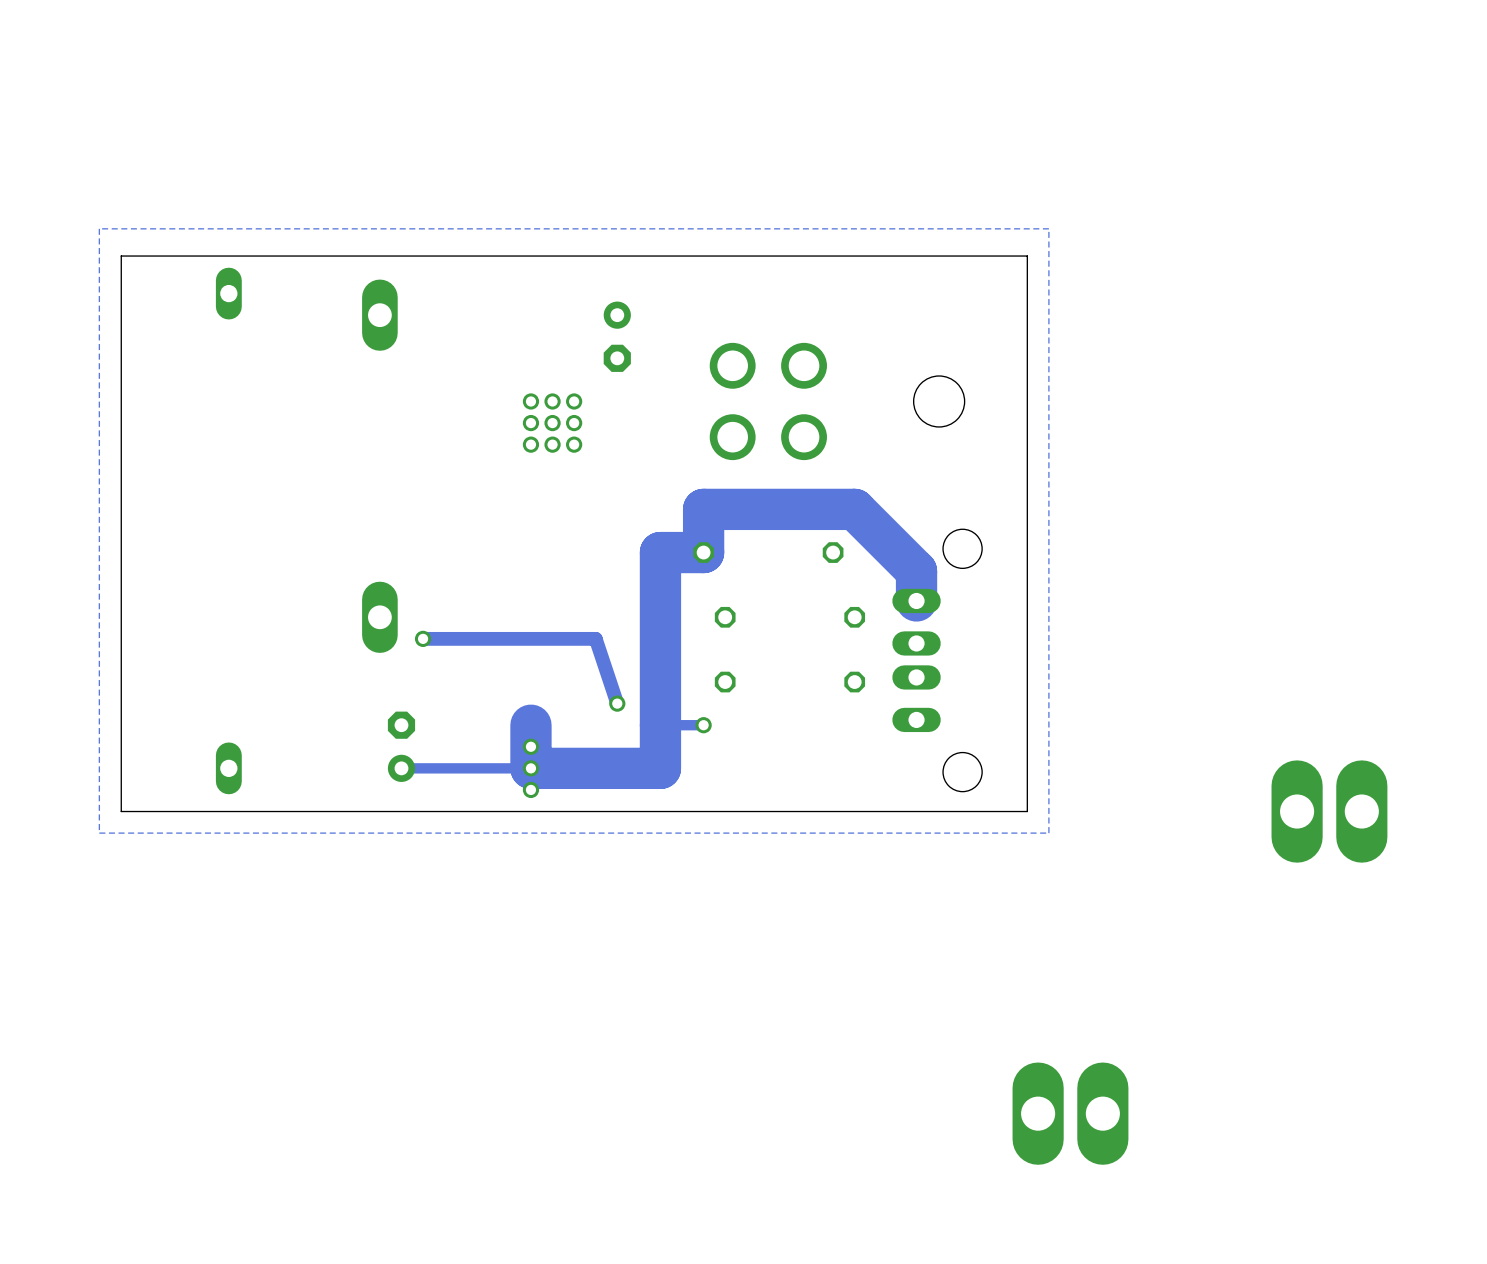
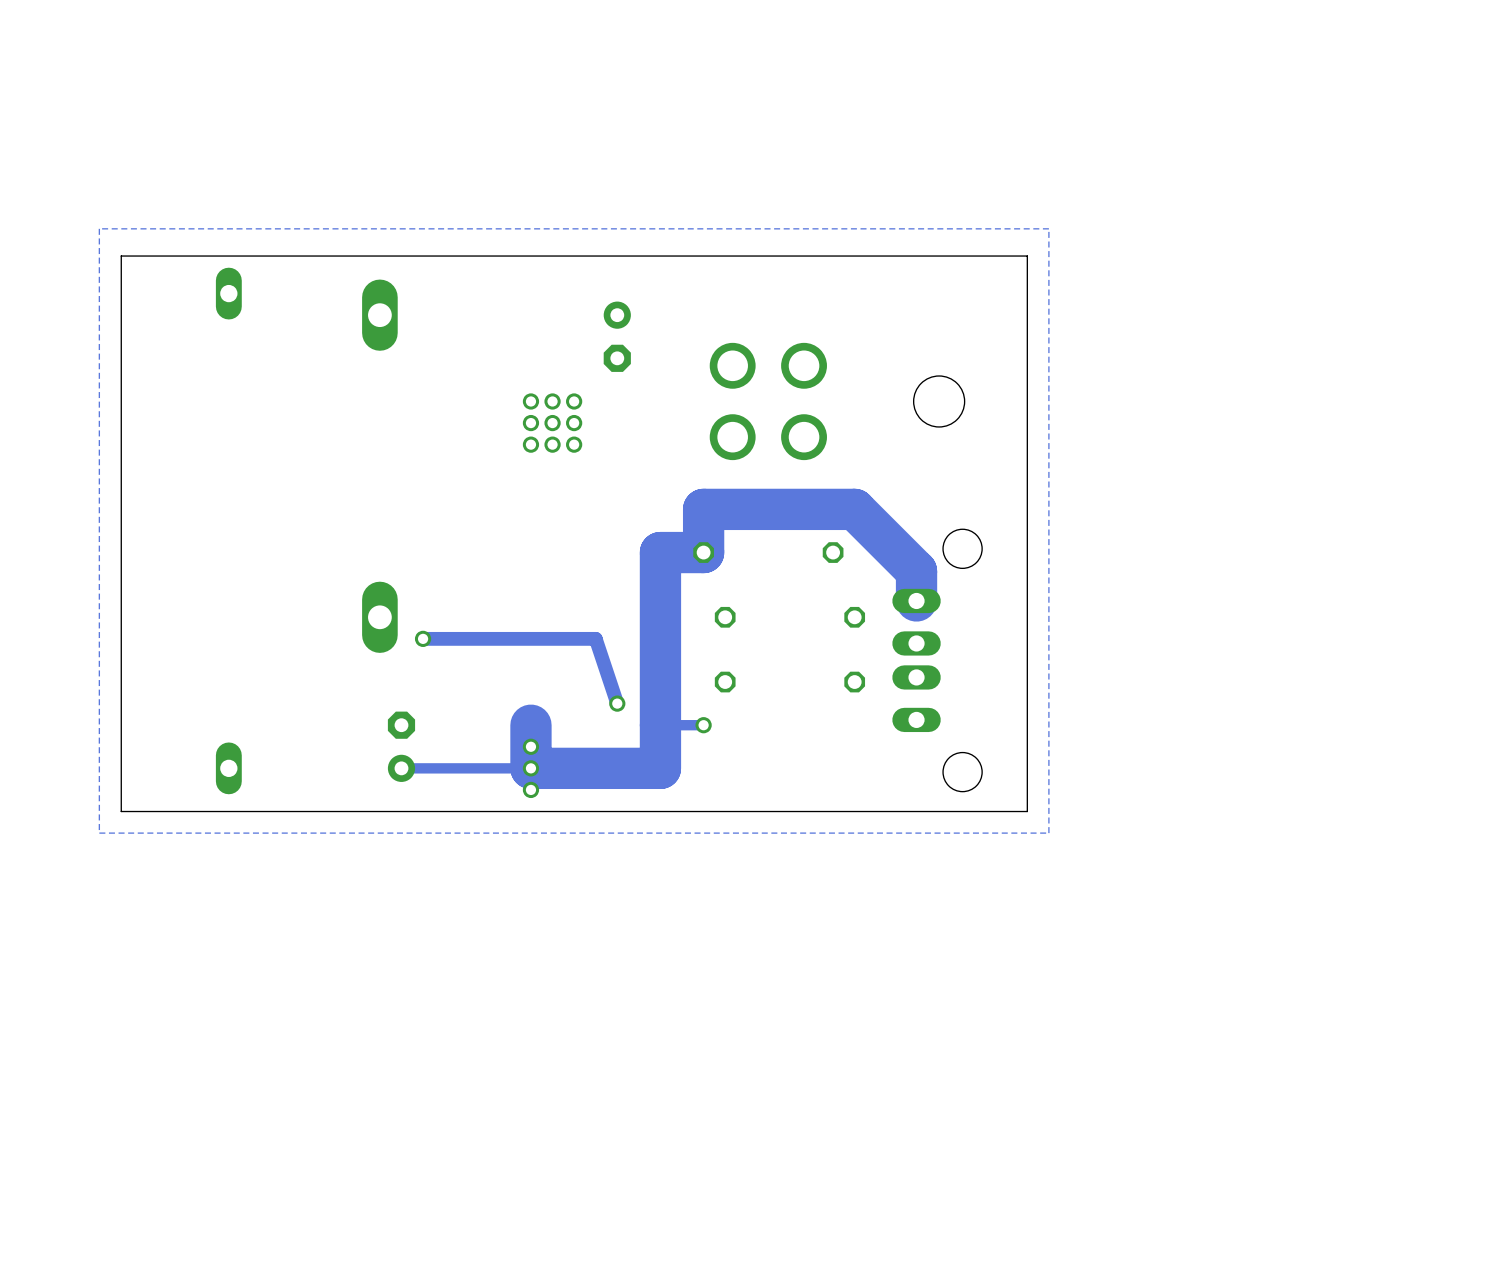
part: (1329, 811) -> none
part: (1070, 1113) -> none

